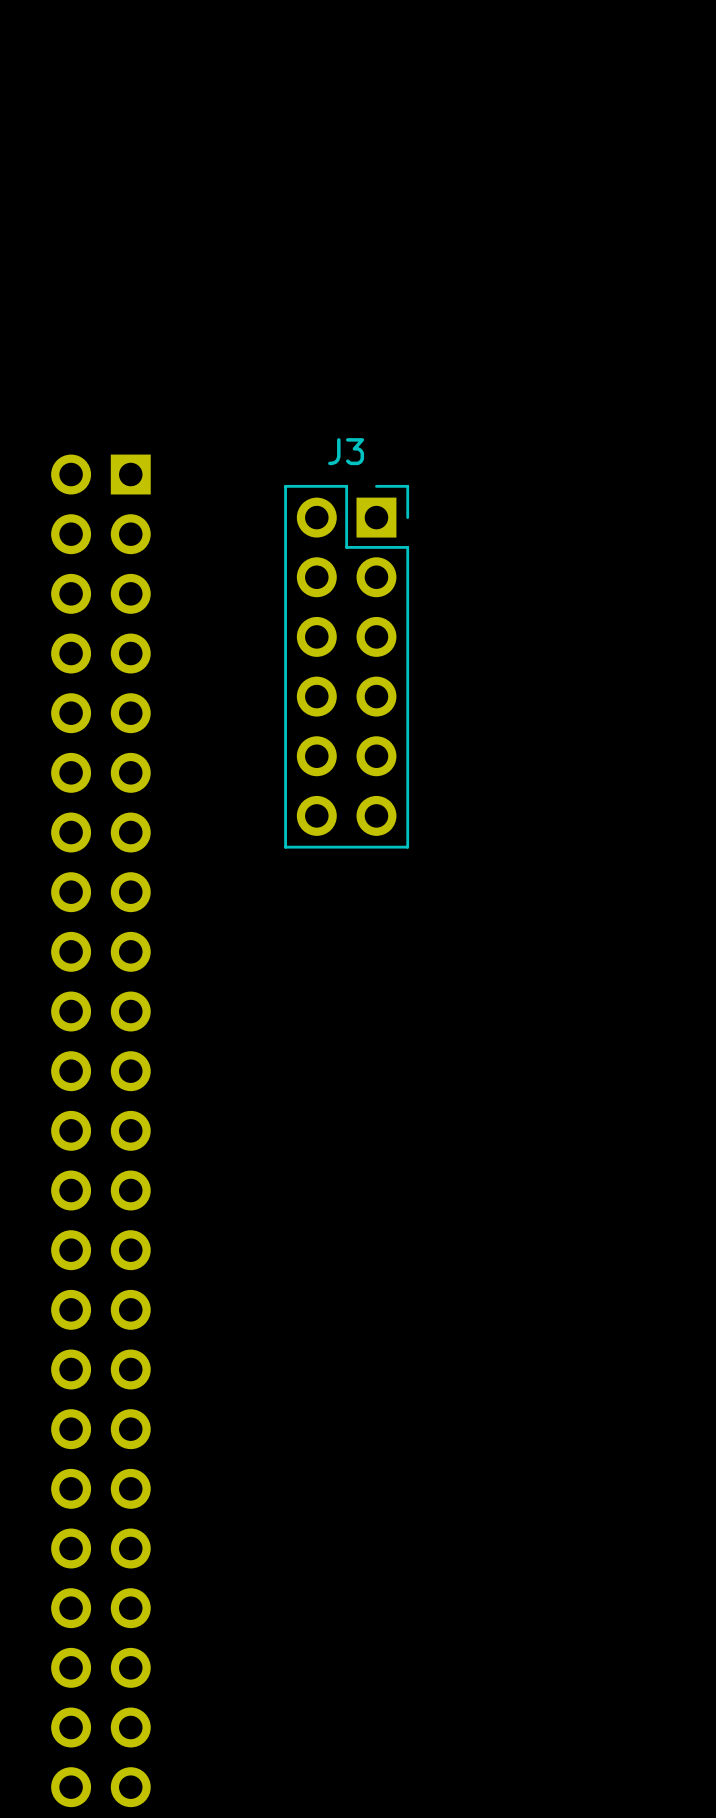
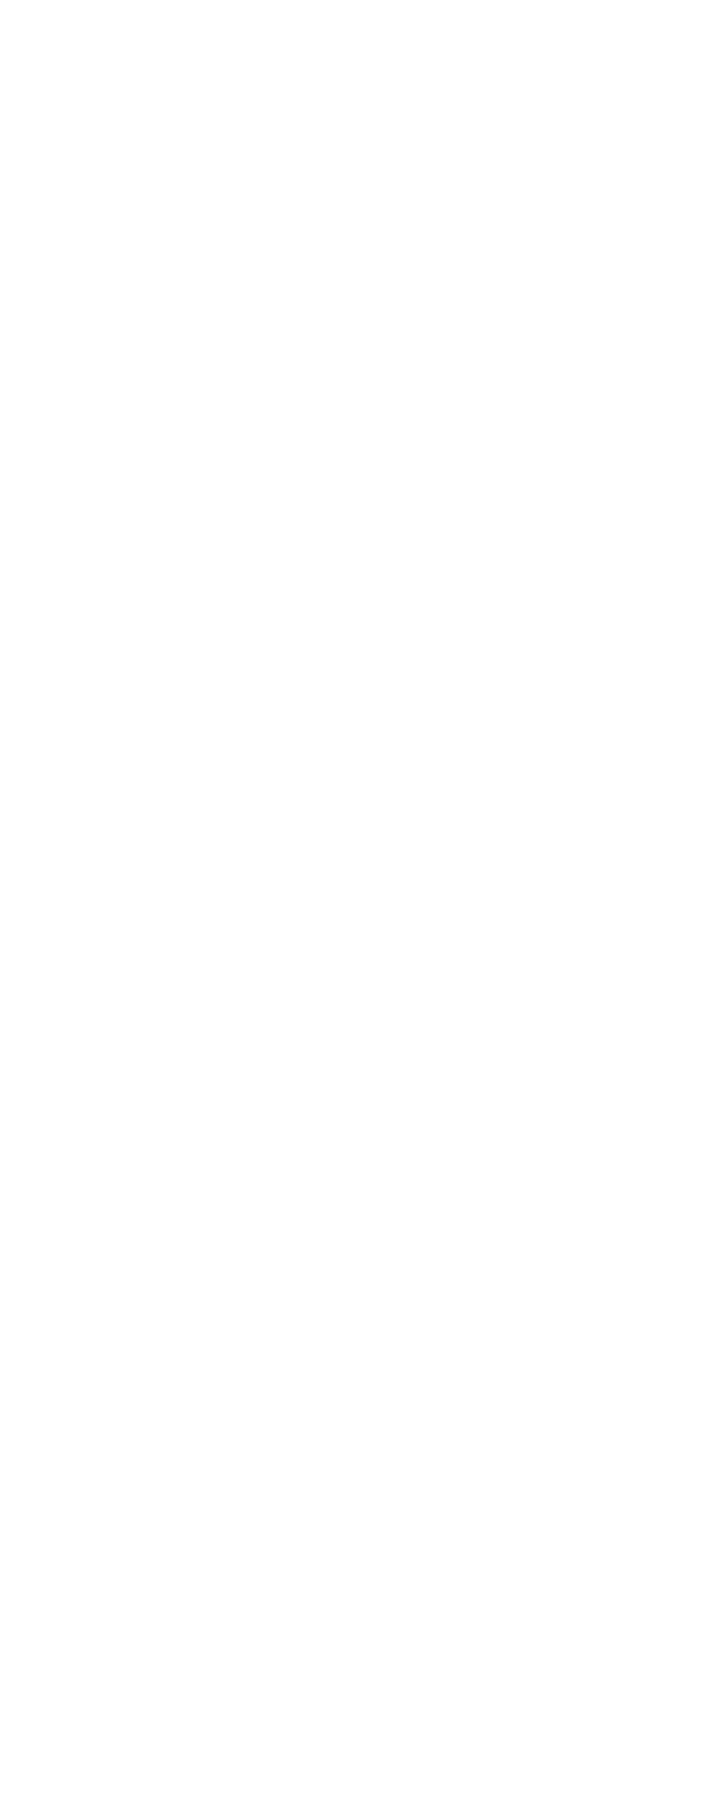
J3: (346, 666) -> none
part: (100, 1130) -> none

